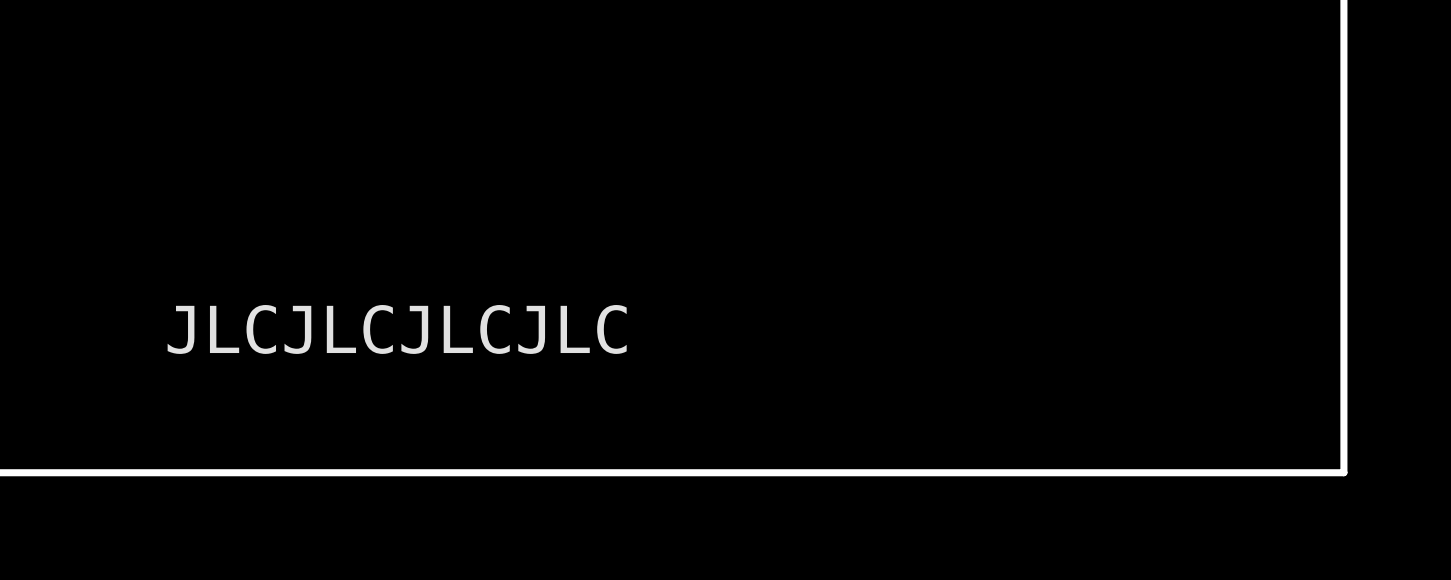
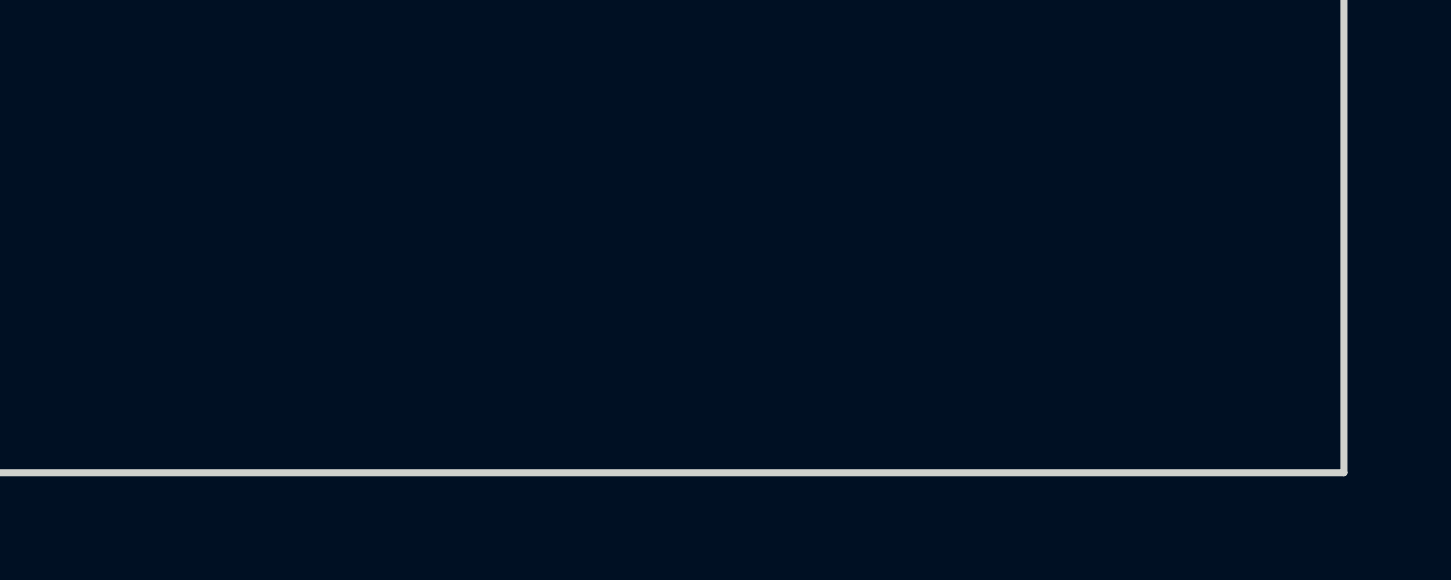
text: JLCJLCJLCJLC (397, 329) -> none

